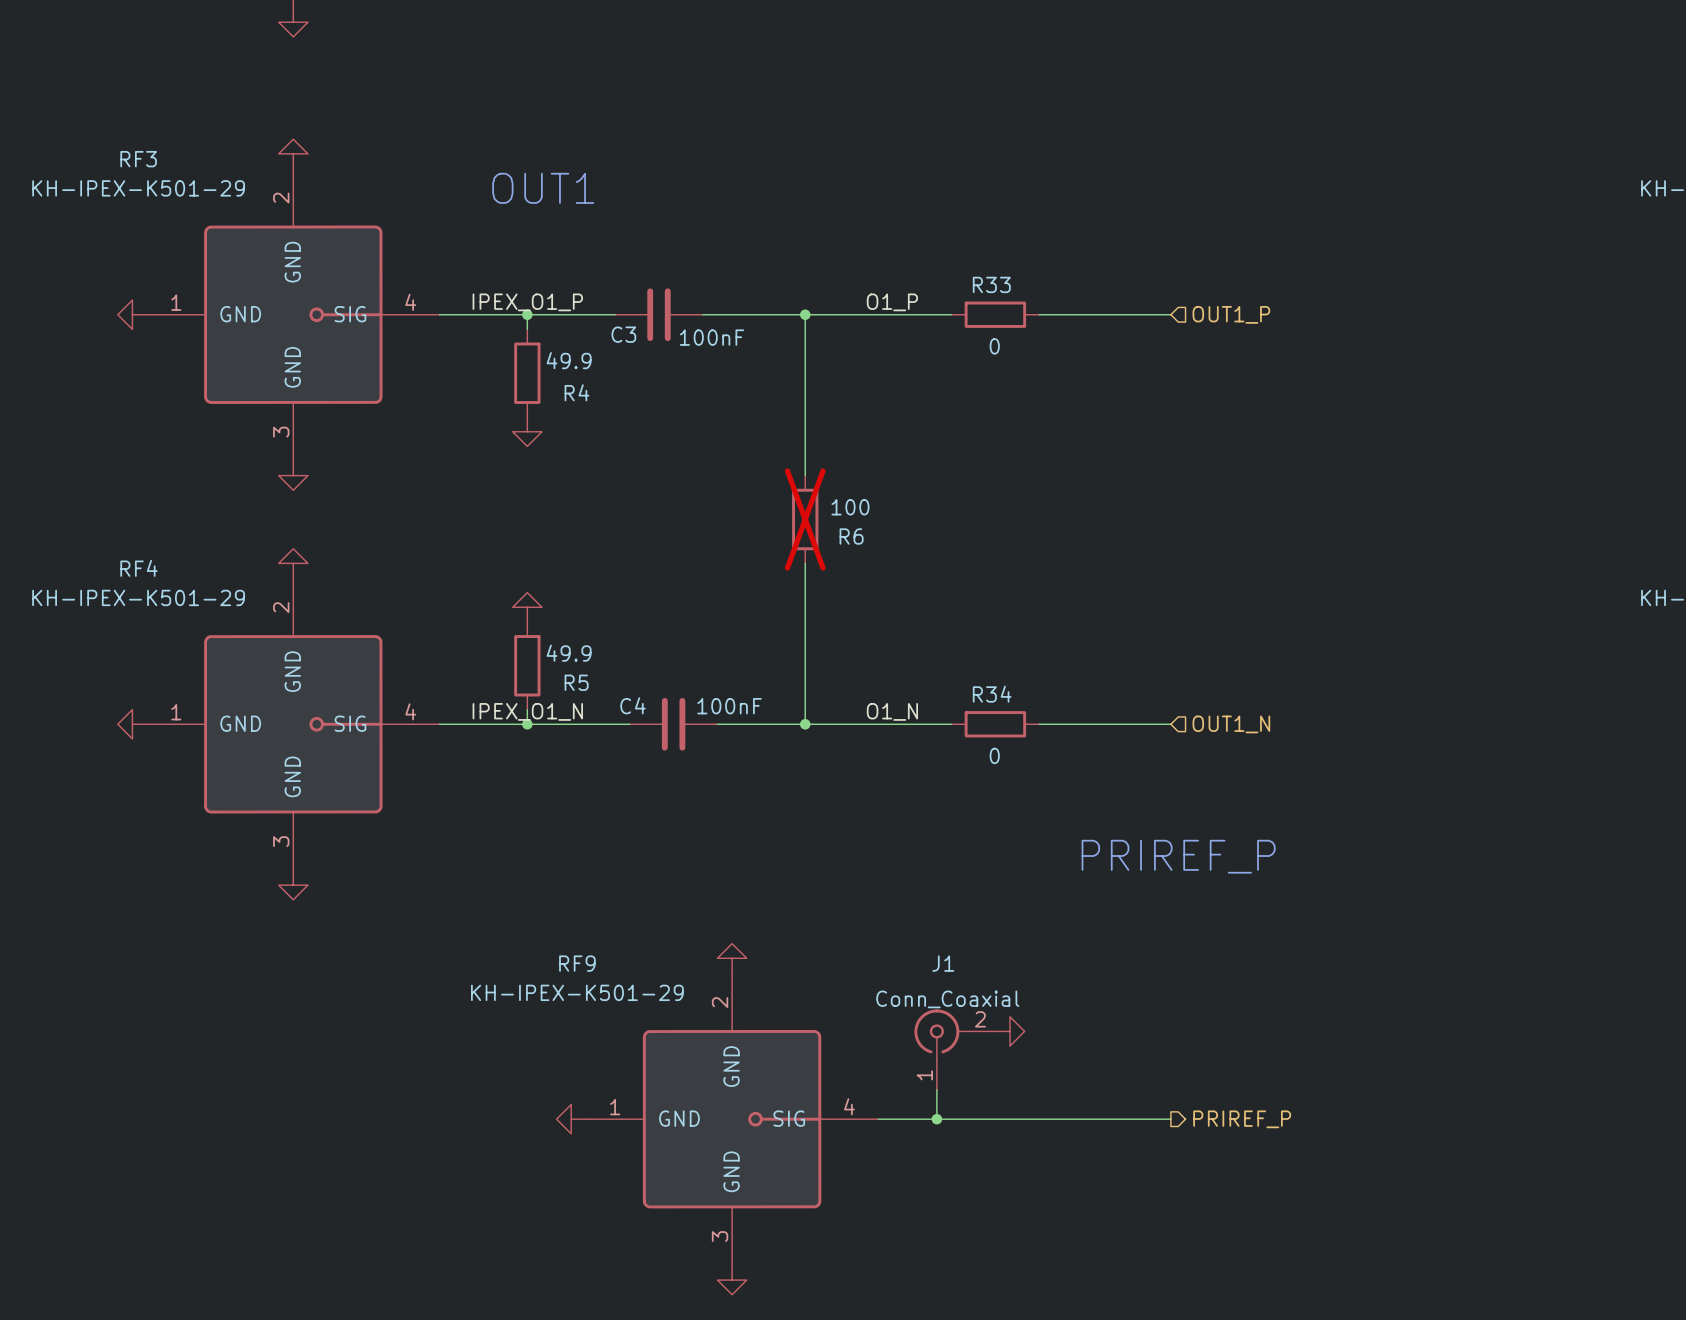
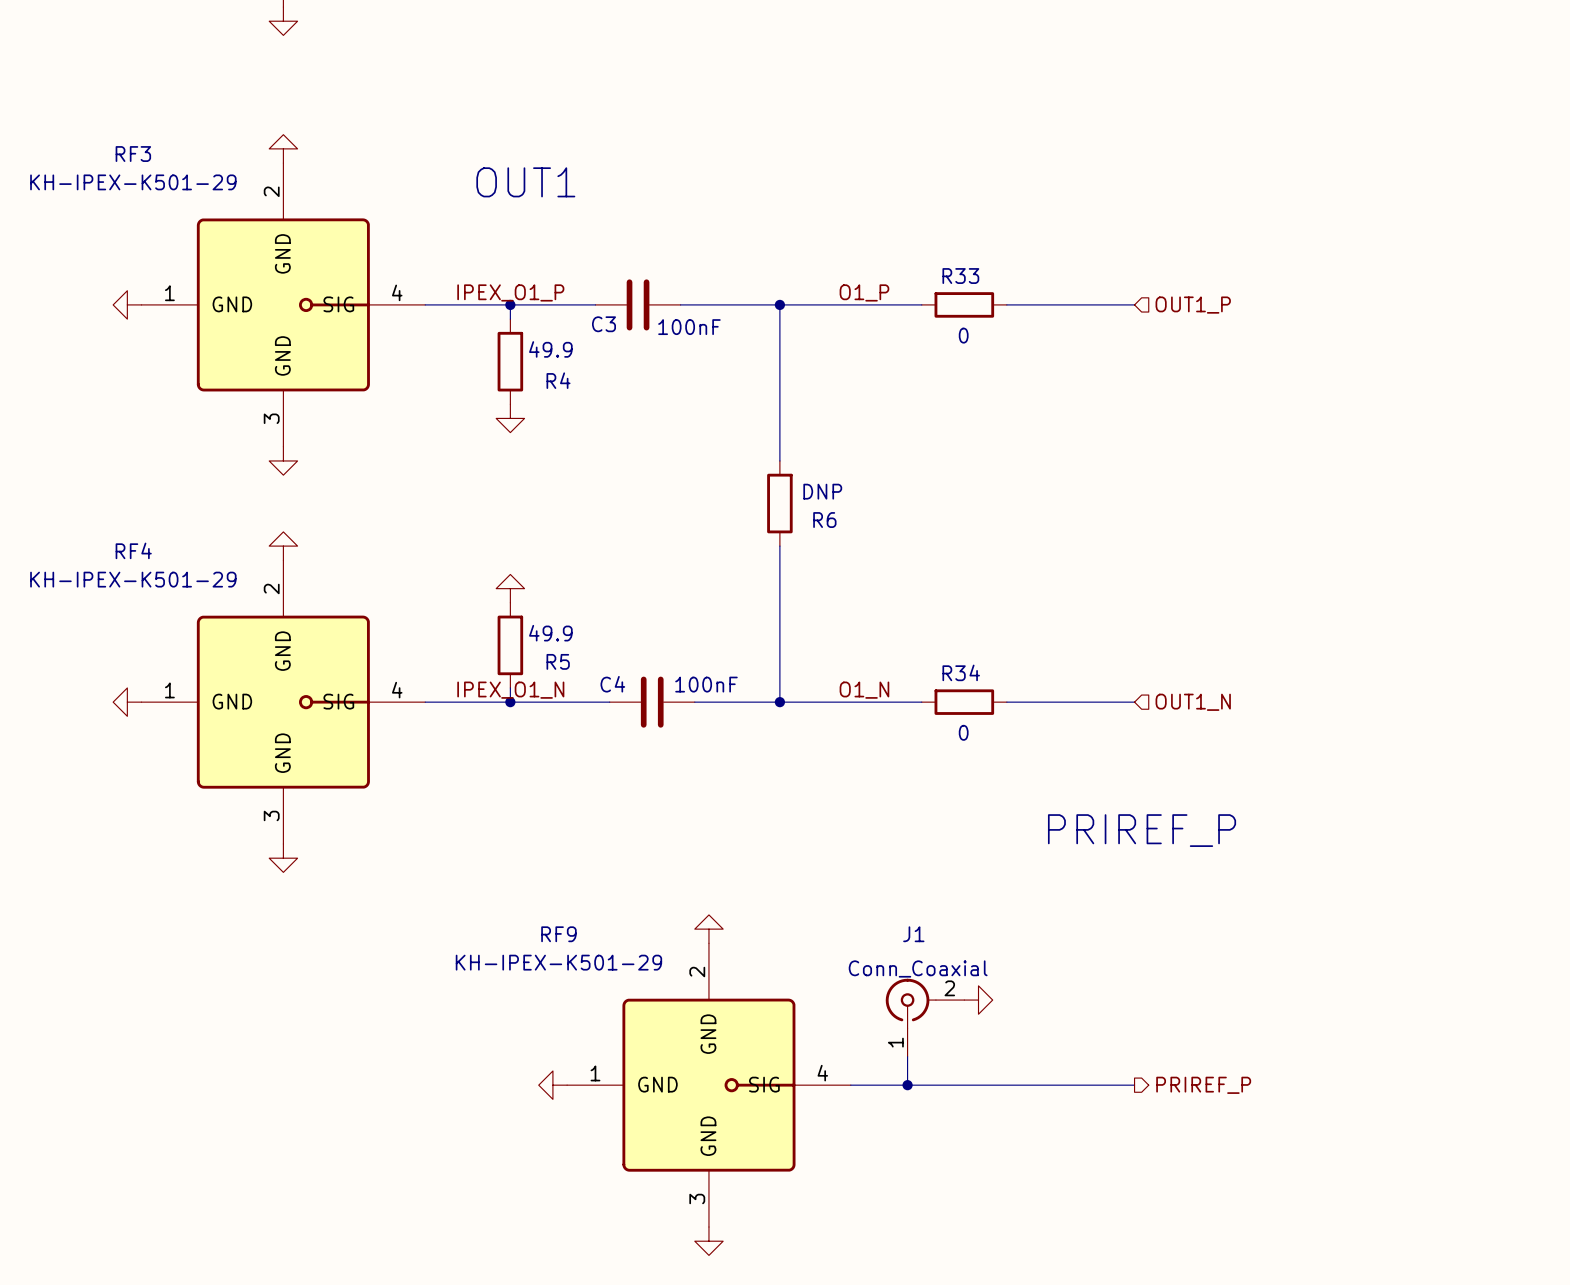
R6 value: 100 (850, 507) -> DNP (822, 491)
R6 do-not-place cross: (805, 519) -> none

